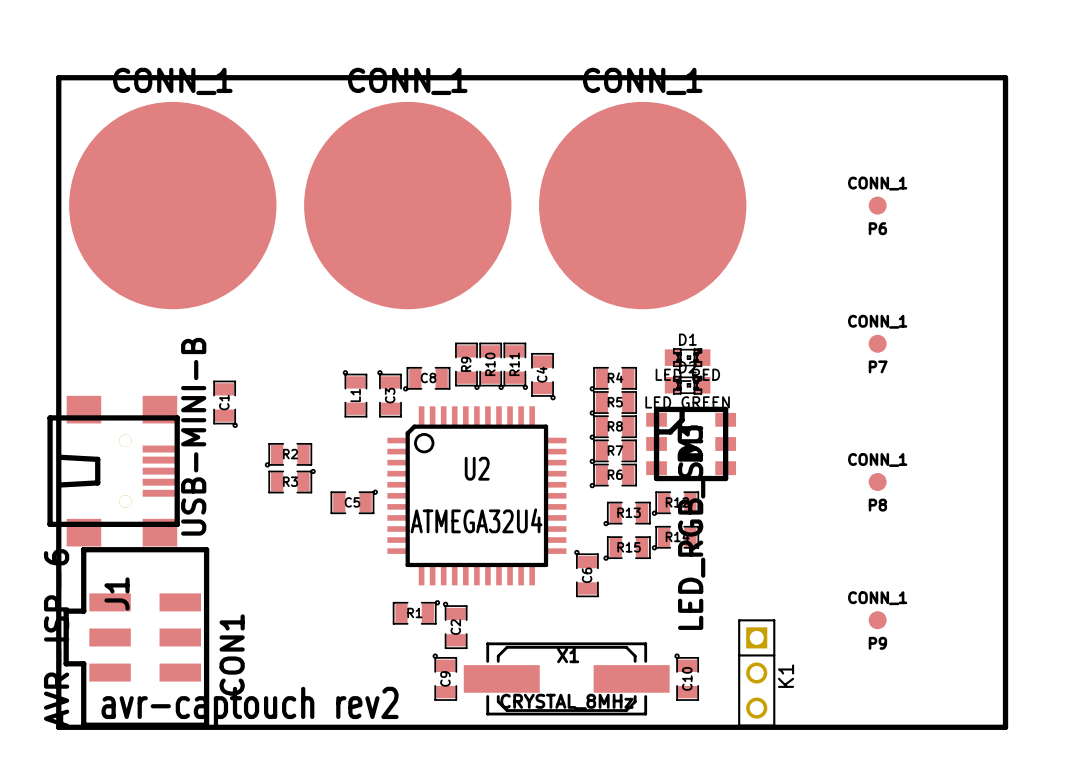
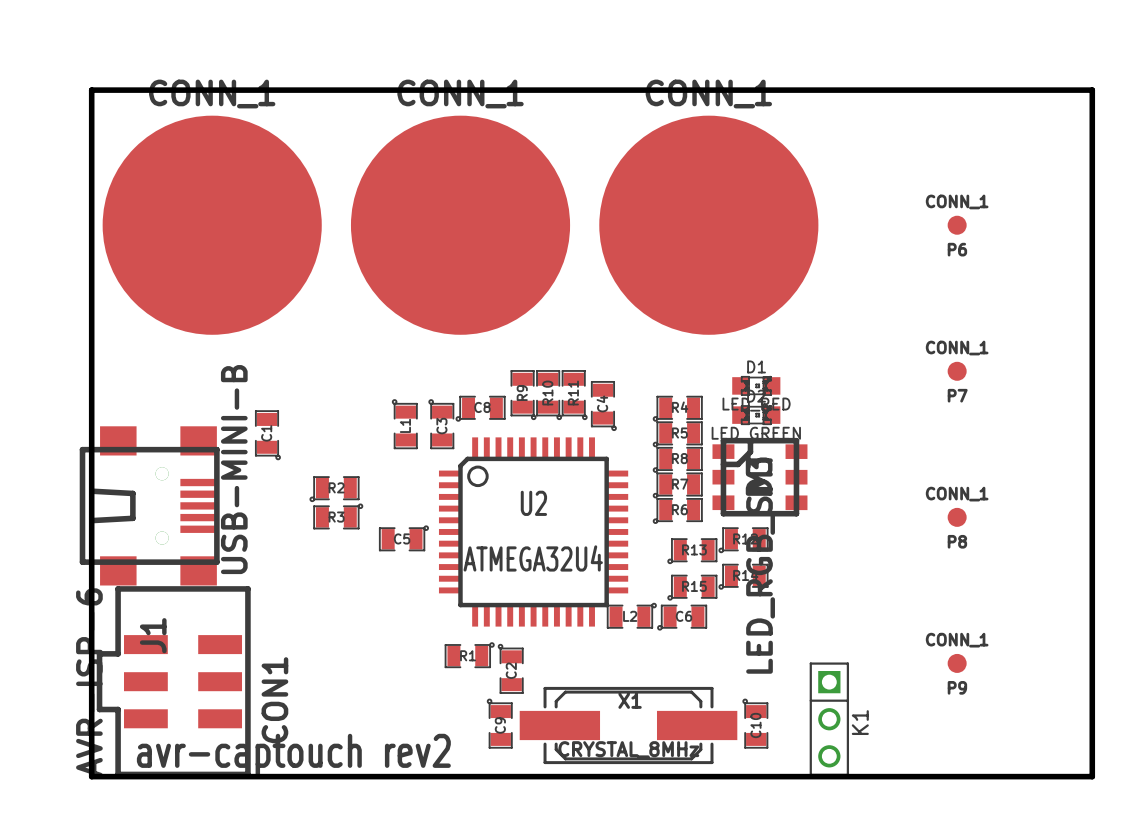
C6 rotation: 0° (586, 573) -> 90° counterclockwise (682, 617)
C6 position: (586, 573) -> (682, 617)
L2: none -> (631, 615)

